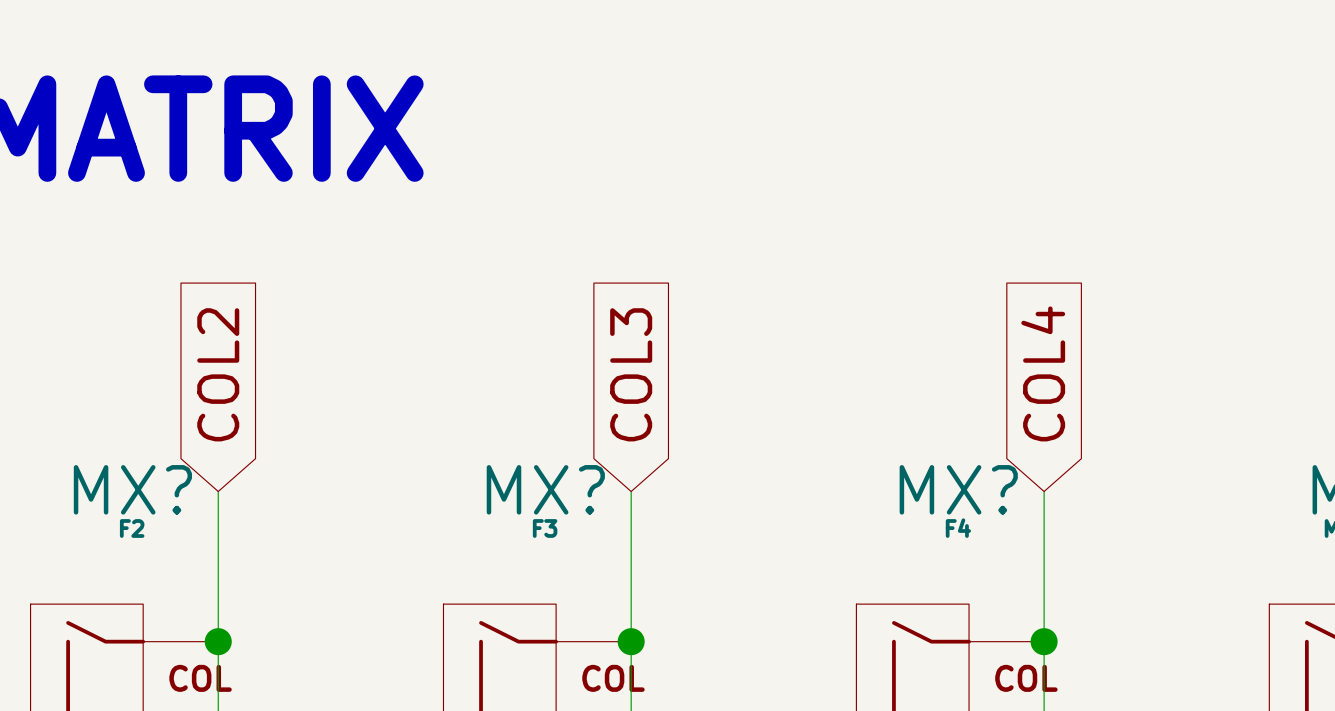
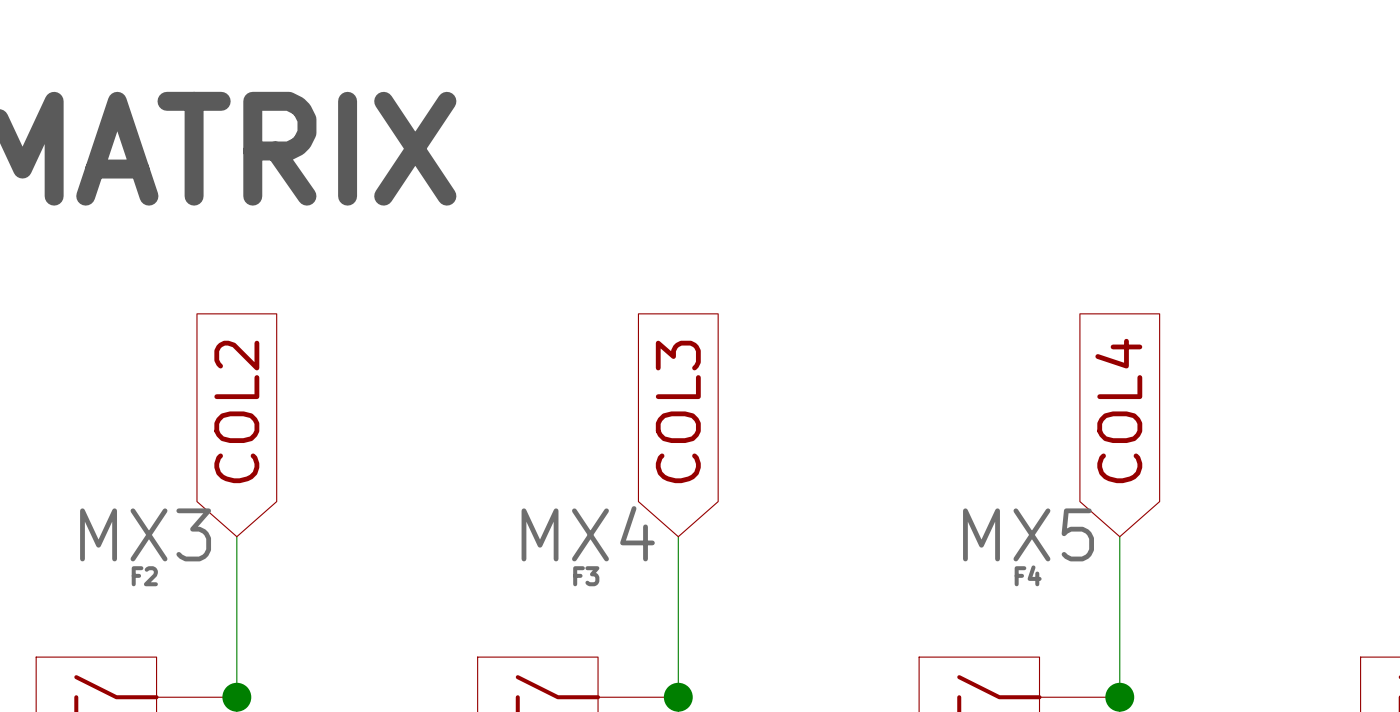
MX? name: MX? (132, 489) -> MX3 (145, 534)
MX? name: MX? (545, 489) -> MX4 (588, 533)
MX? name: MX? (958, 489) -> MX5 (1028, 534)

